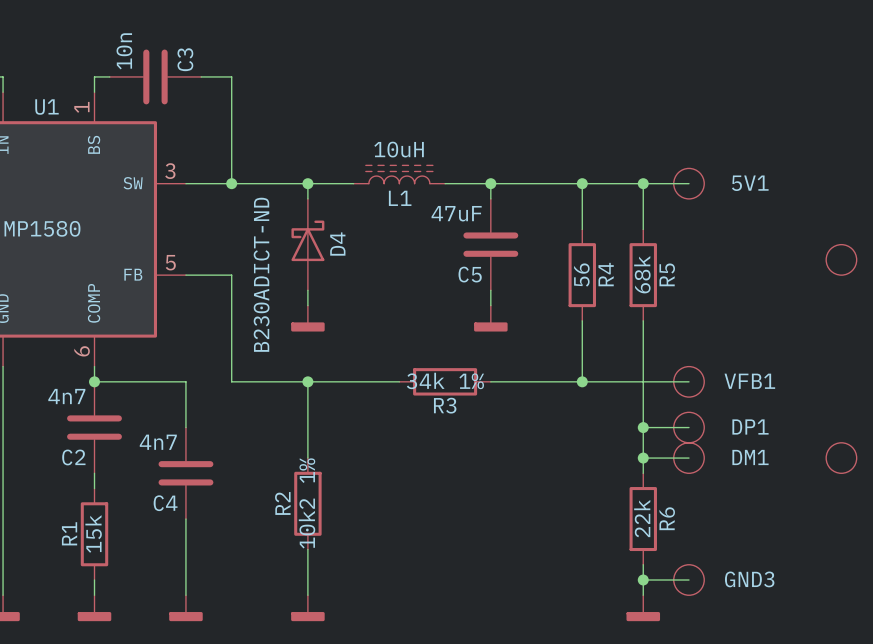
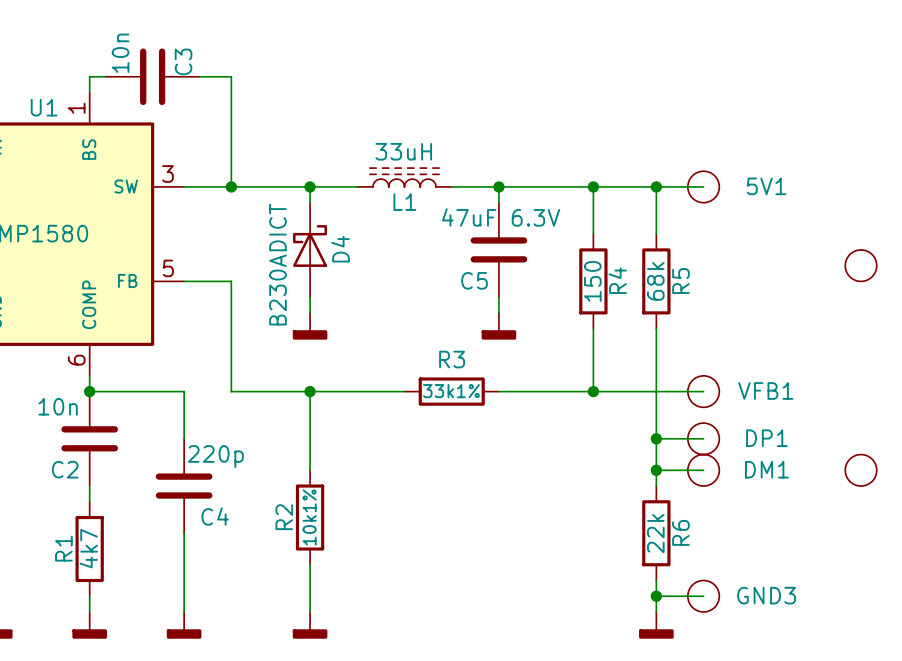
L1 value: 10uH (399, 149) -> 33uH (403, 151)
C5 value: 47uF (456, 213) -> 47uF 6.3V (501, 217)
D4 value: B230ADICT-ND (261, 274) -> B230ADICT (277, 264)
R4 value: 56 (581, 275) -> 150 (592, 281)
R3 value: 34k 1% (445, 380) -> 33k1% (451, 391)
C2 value: 4n7 (66, 396) -> 10n (58, 406)
R3 name position: R3 (445, 405) -> R3 (452, 359)
C4 value: 4n7 (158, 442) -> 220p (215, 456)
C4 name position: C4 (165, 503) -> C4 (215, 516)
R2 value: 10k2 1% (307, 503) -> 10k1% (309, 517)
R1 value: 15k (93, 533) -> 4k7 (88, 548)

